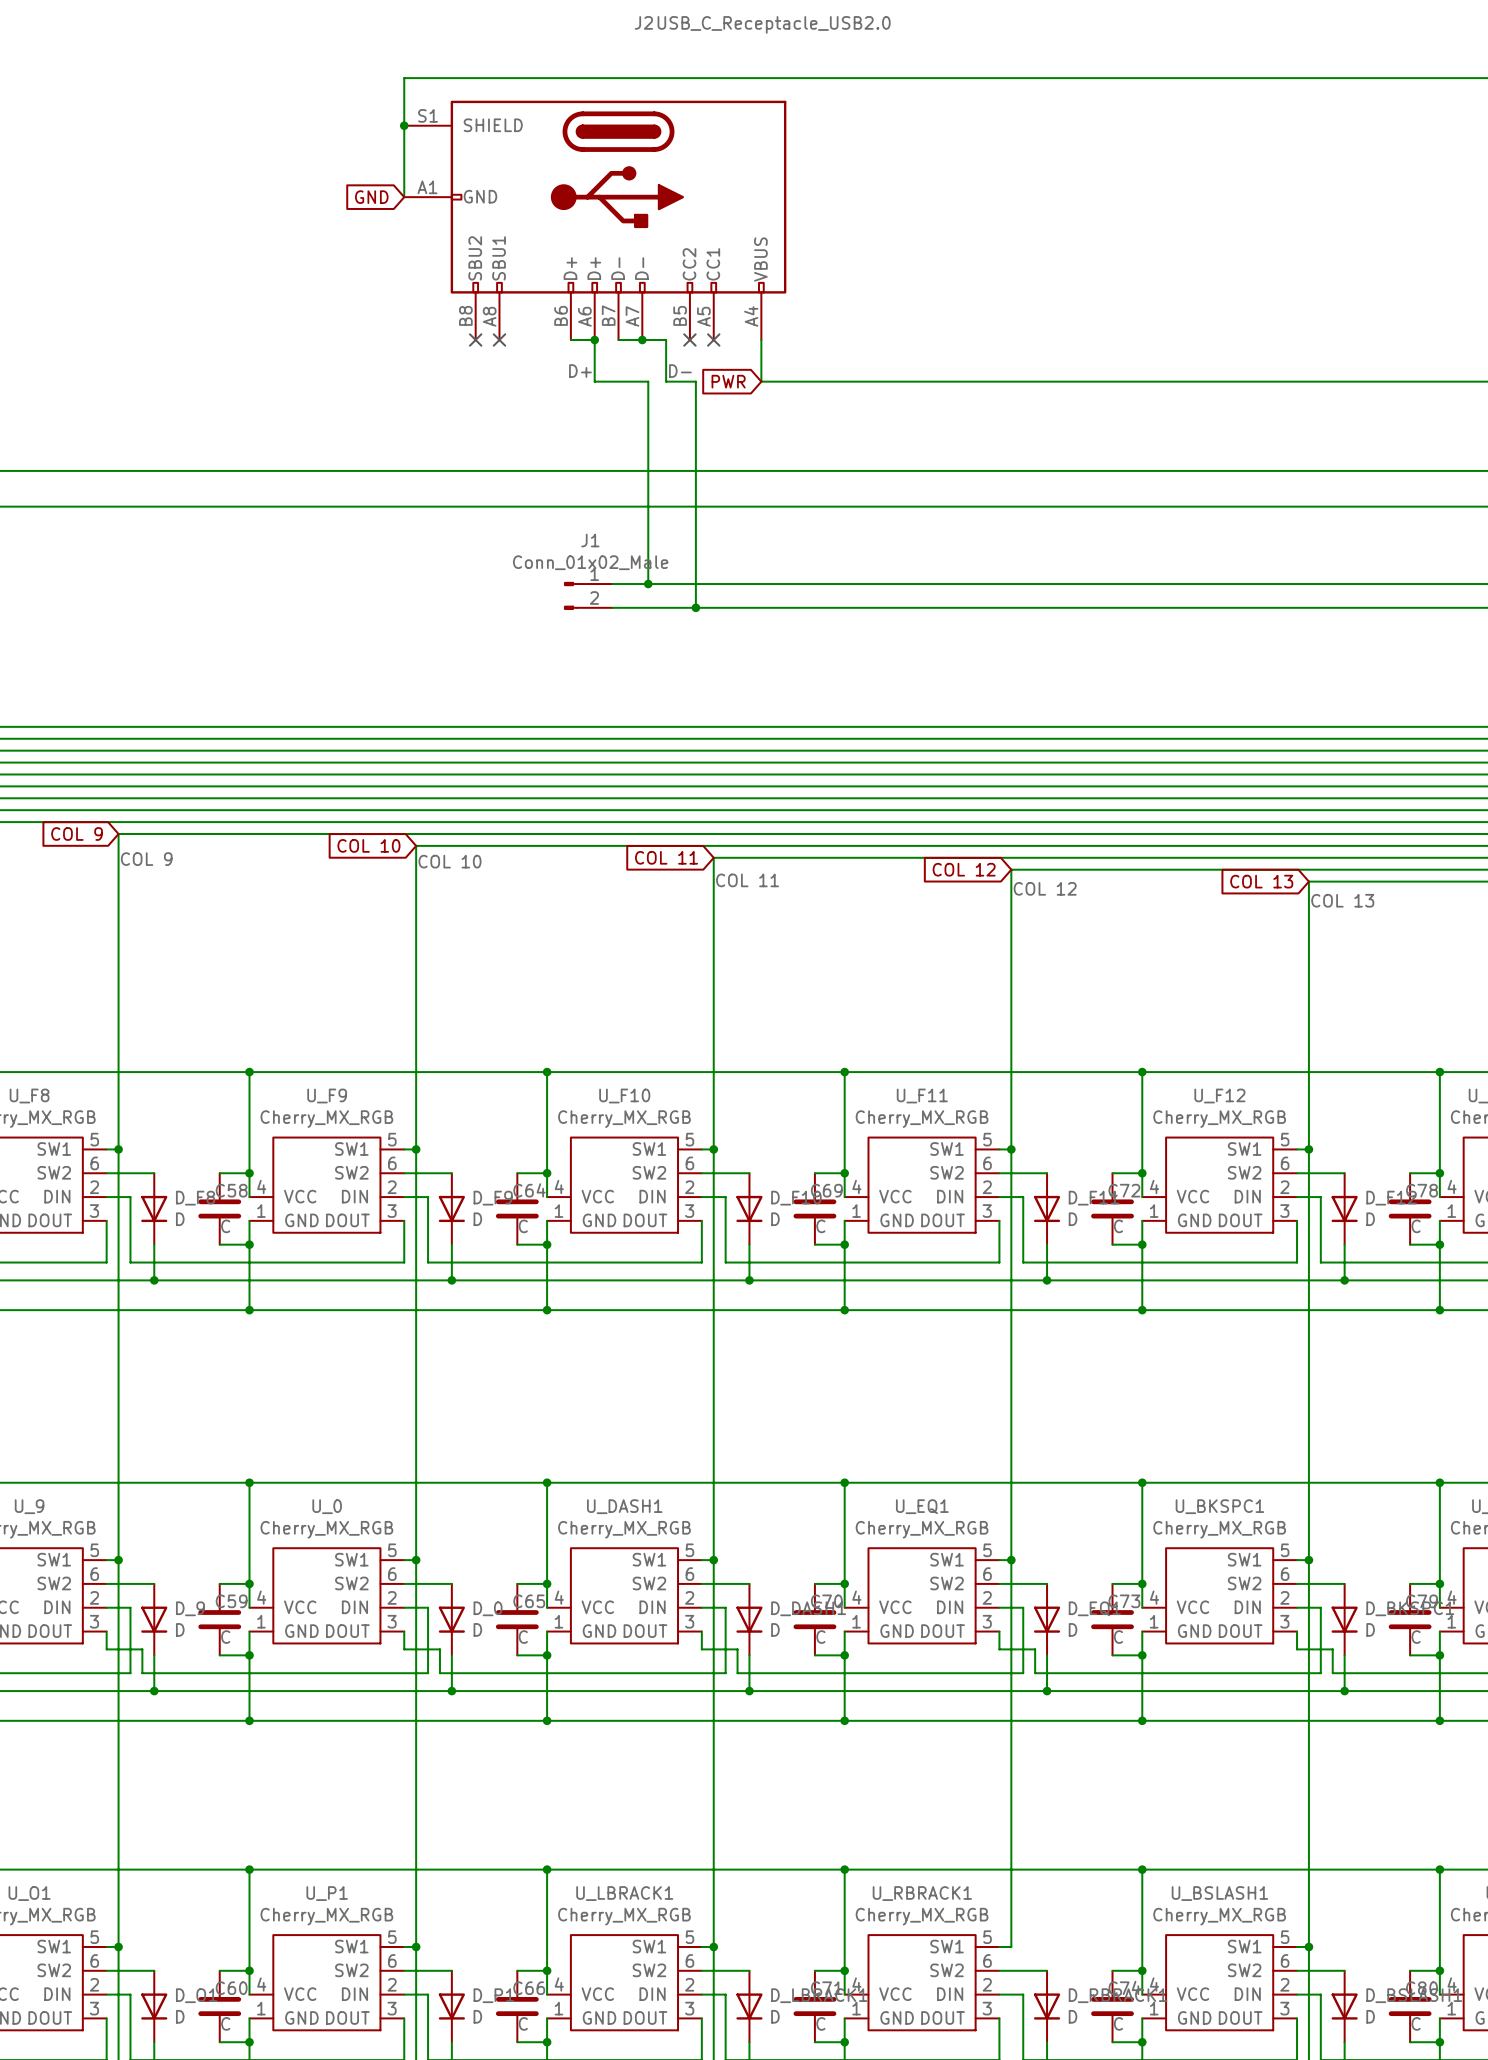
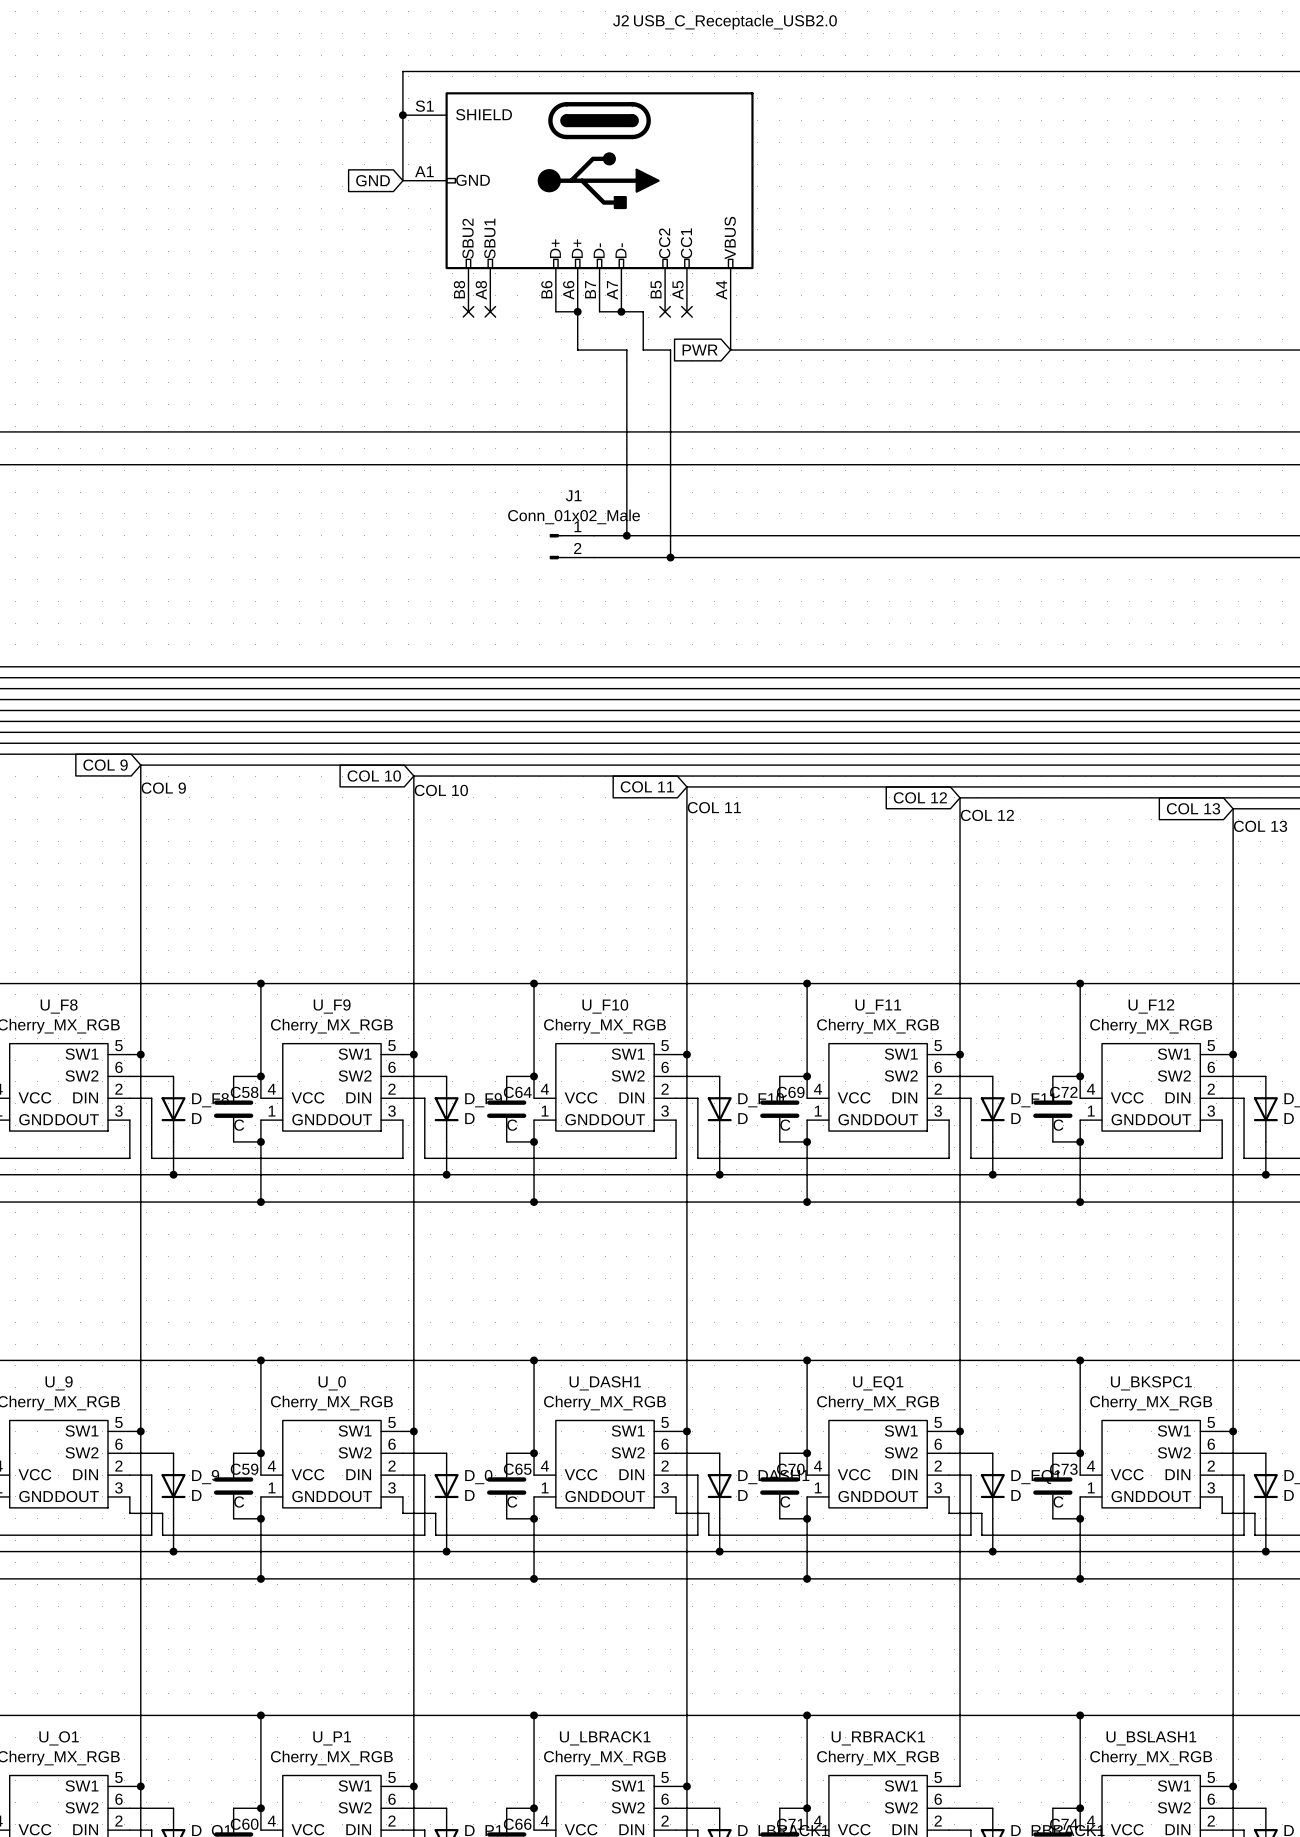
label: D+ (580, 371) -> none
label: D- (680, 371) -> none

